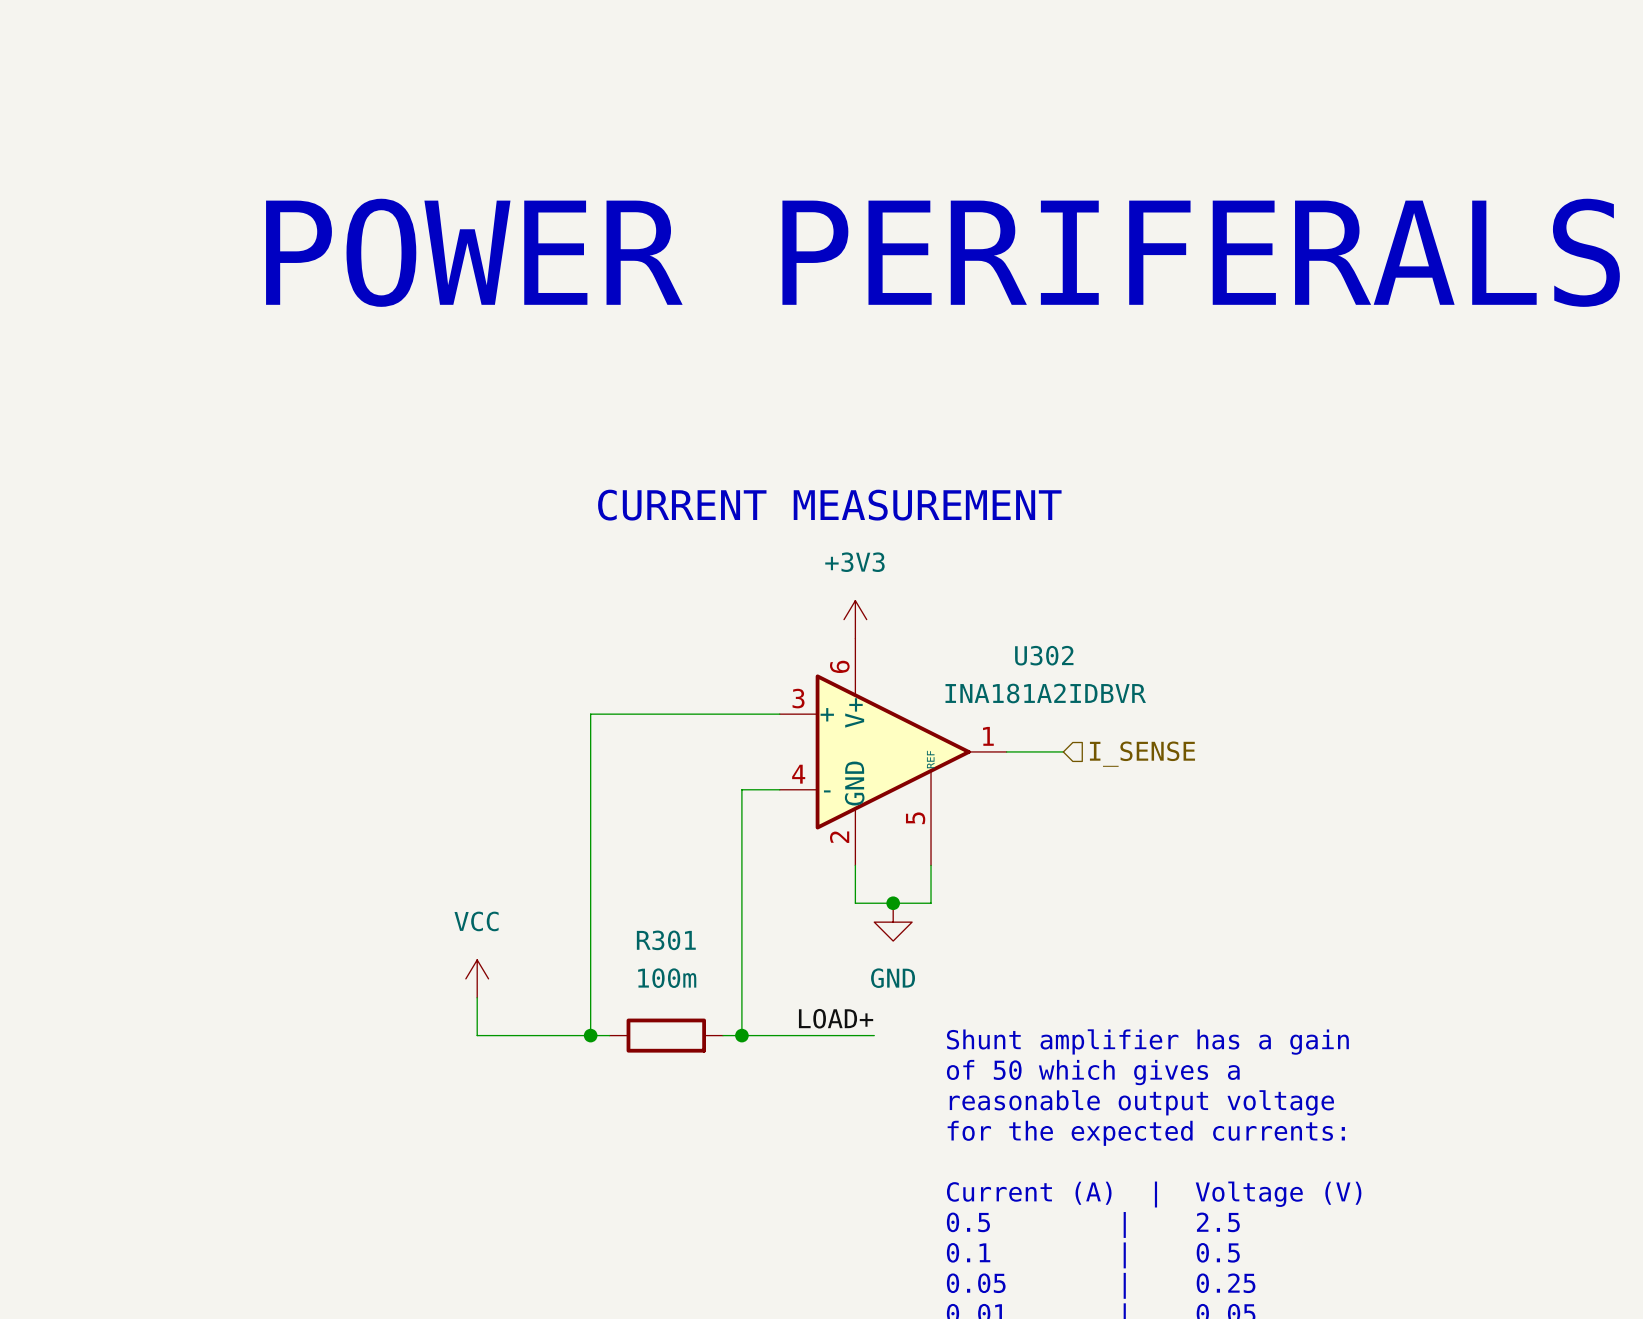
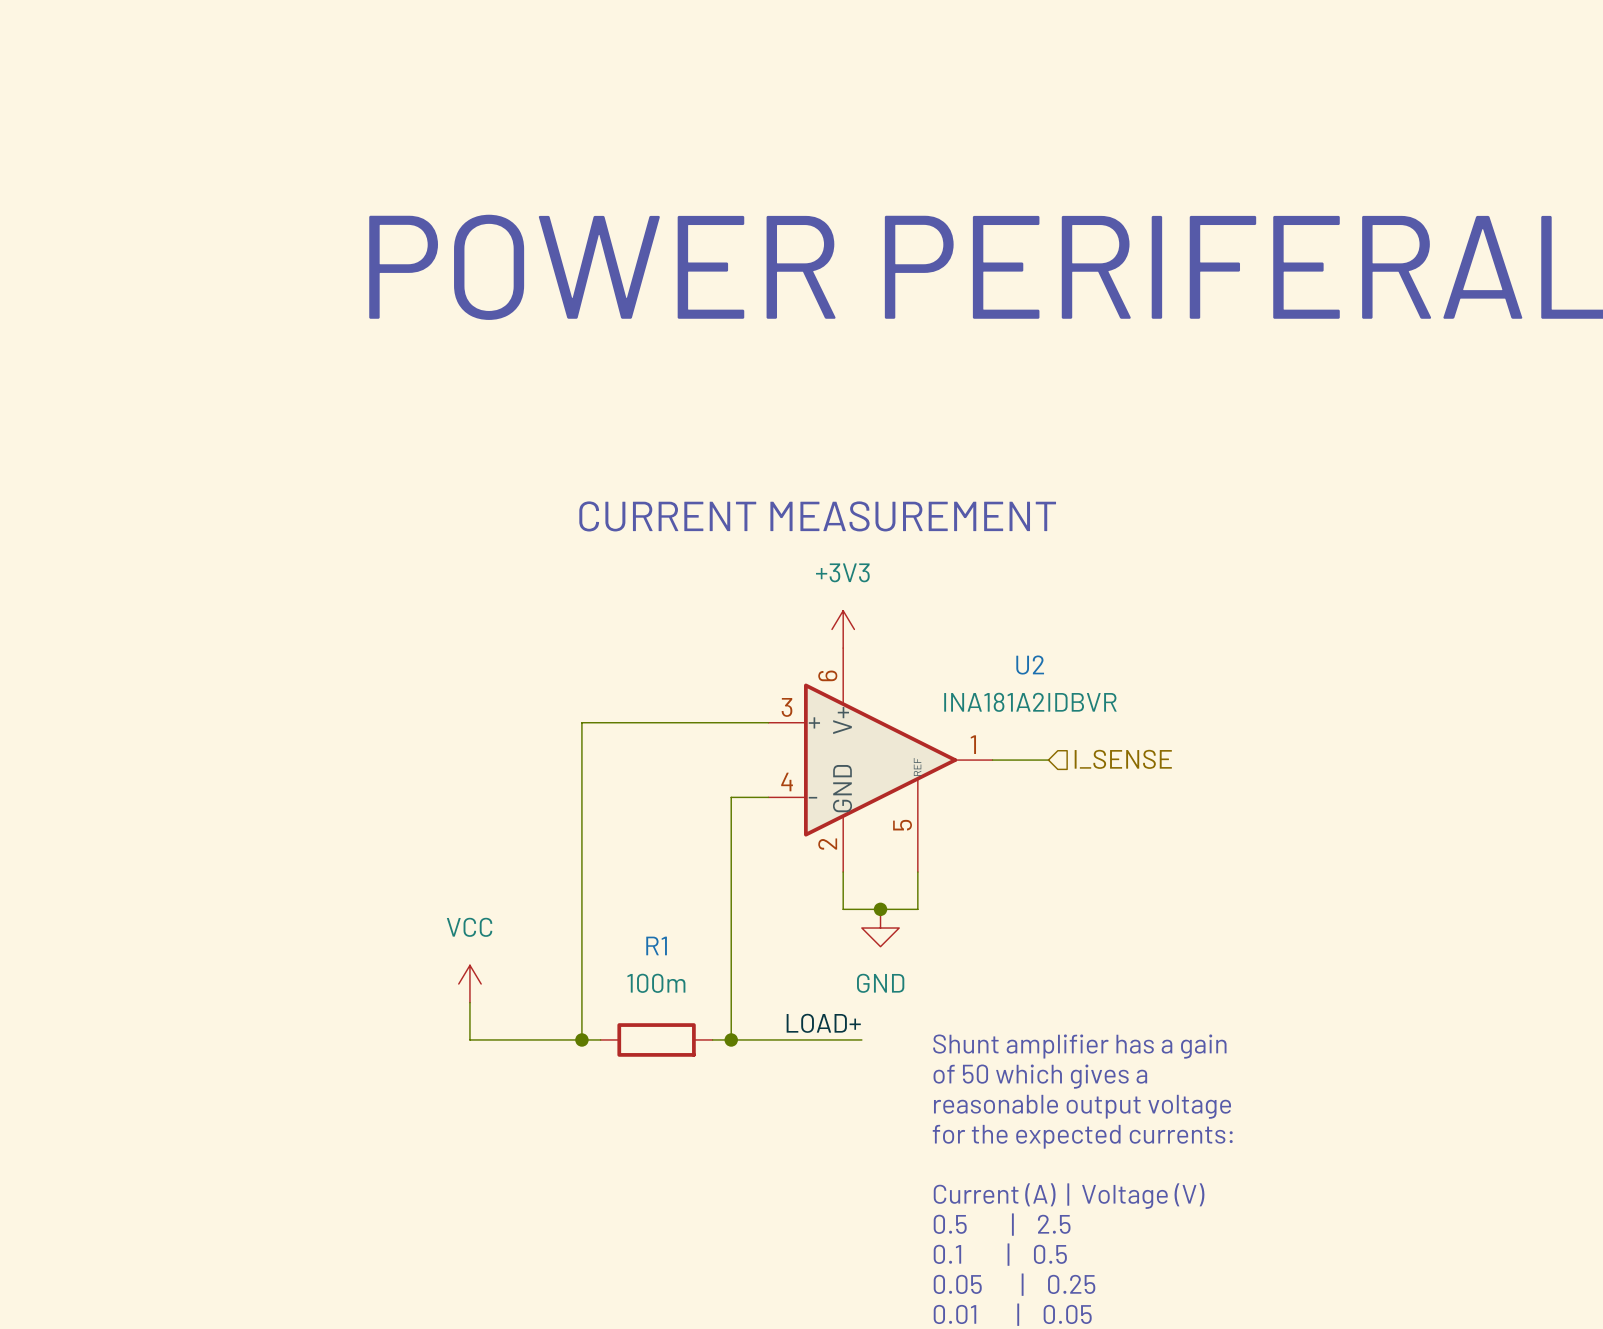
U302 name: U302 (1044, 655) -> U2 (1030, 665)
R301 name: R301 (666, 940) -> R1 (656, 945)

